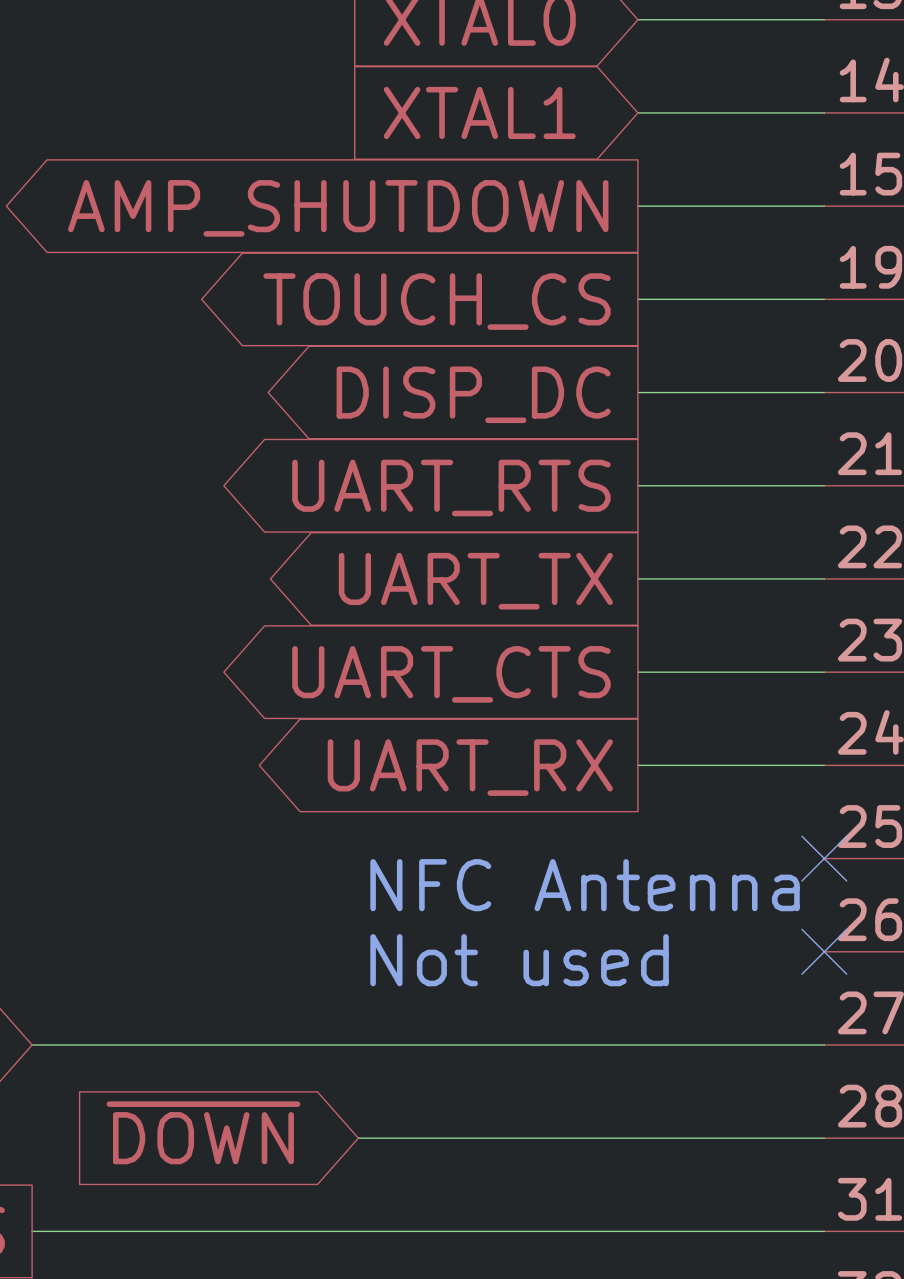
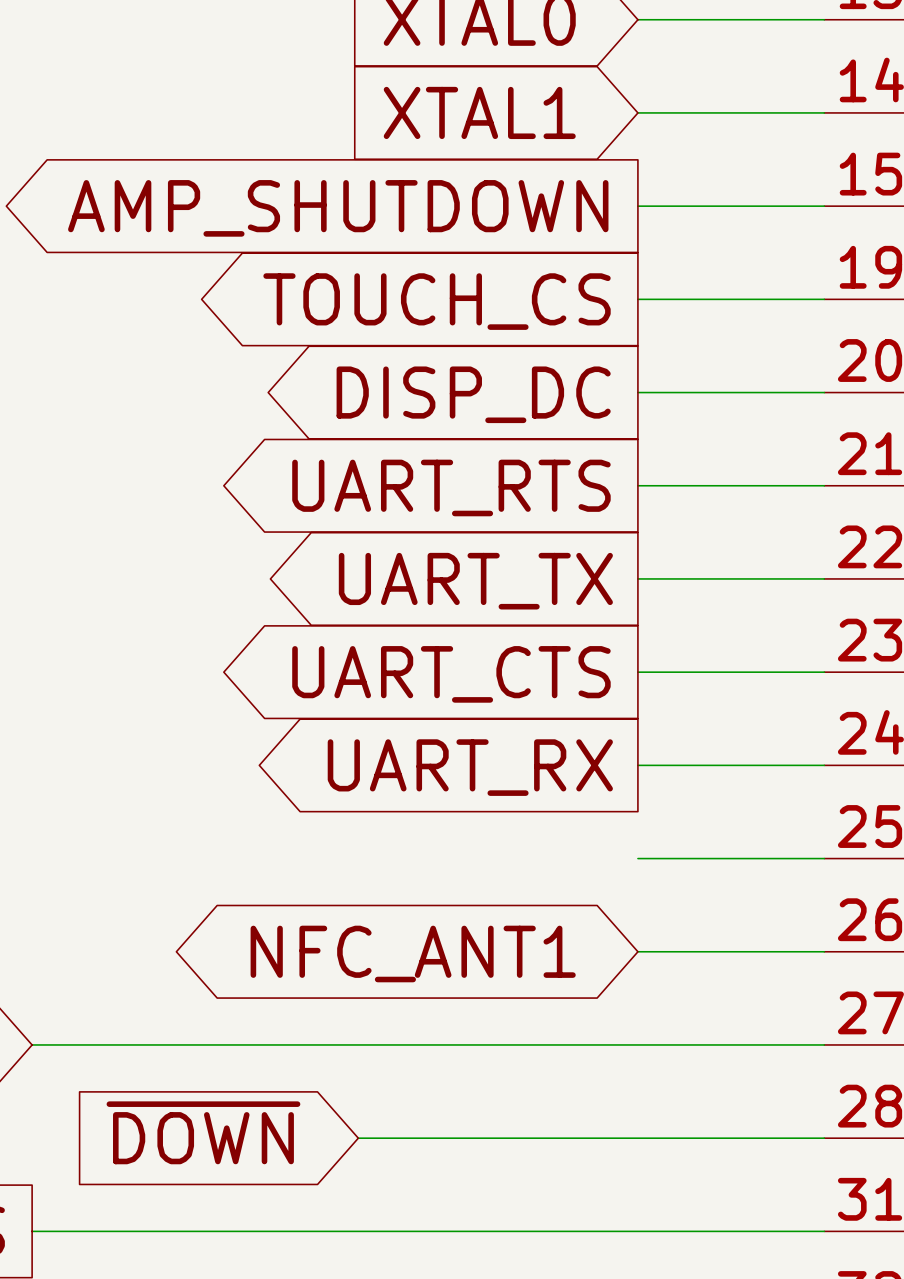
wire: none -> (637, 858) (824, 858)
no-connect mark: (824, 858) -> none
text: NFC Antenna (585, 885) -> none
wire: none -> (637, 951) (824, 951)
no-connect mark: (824, 951) -> none
global label: none -> NFC_ANT1 (413, 953)
text: Not used (519, 960) -> none

